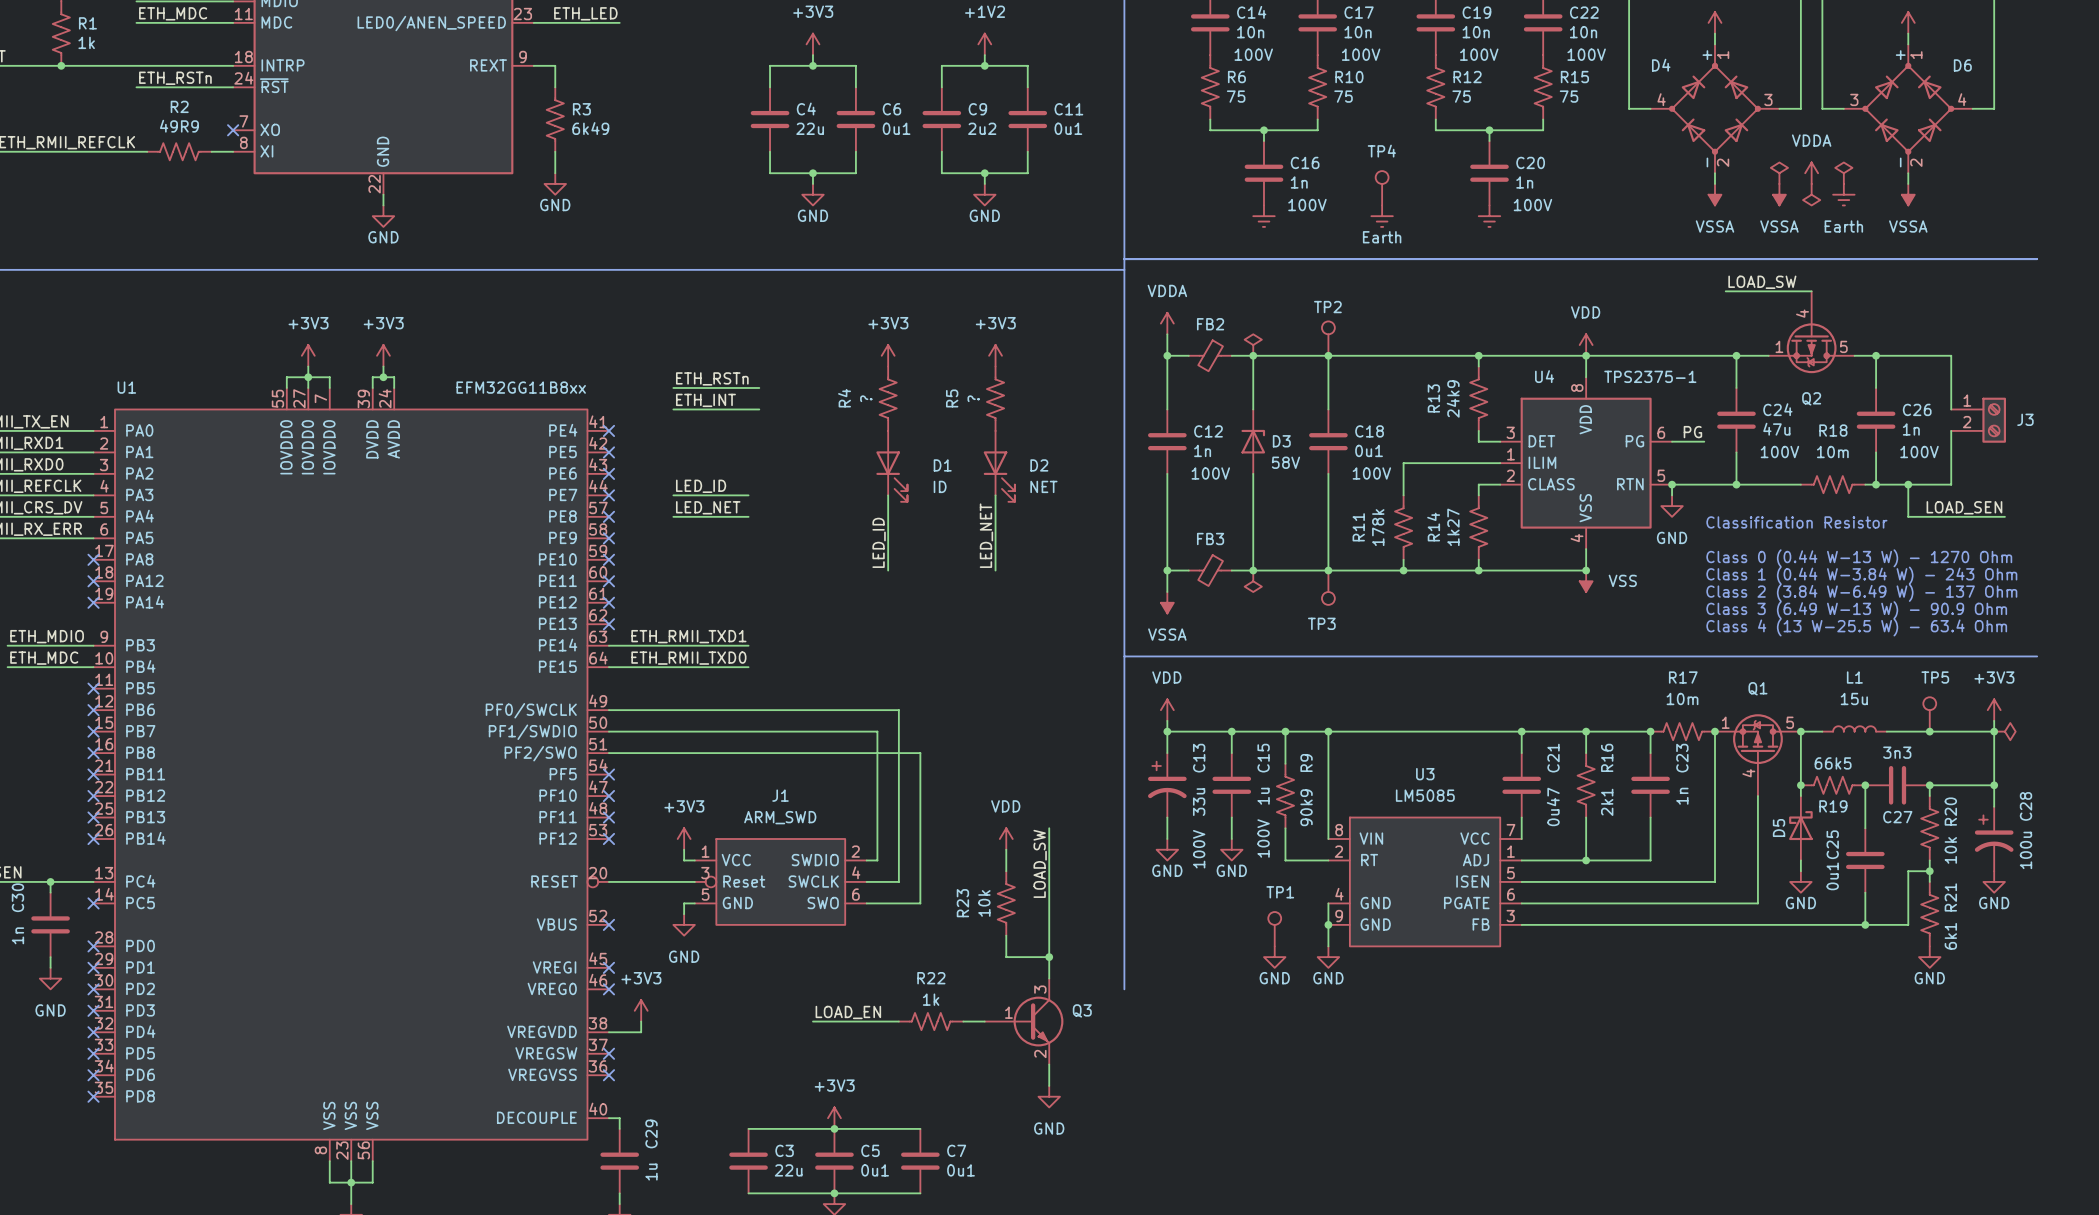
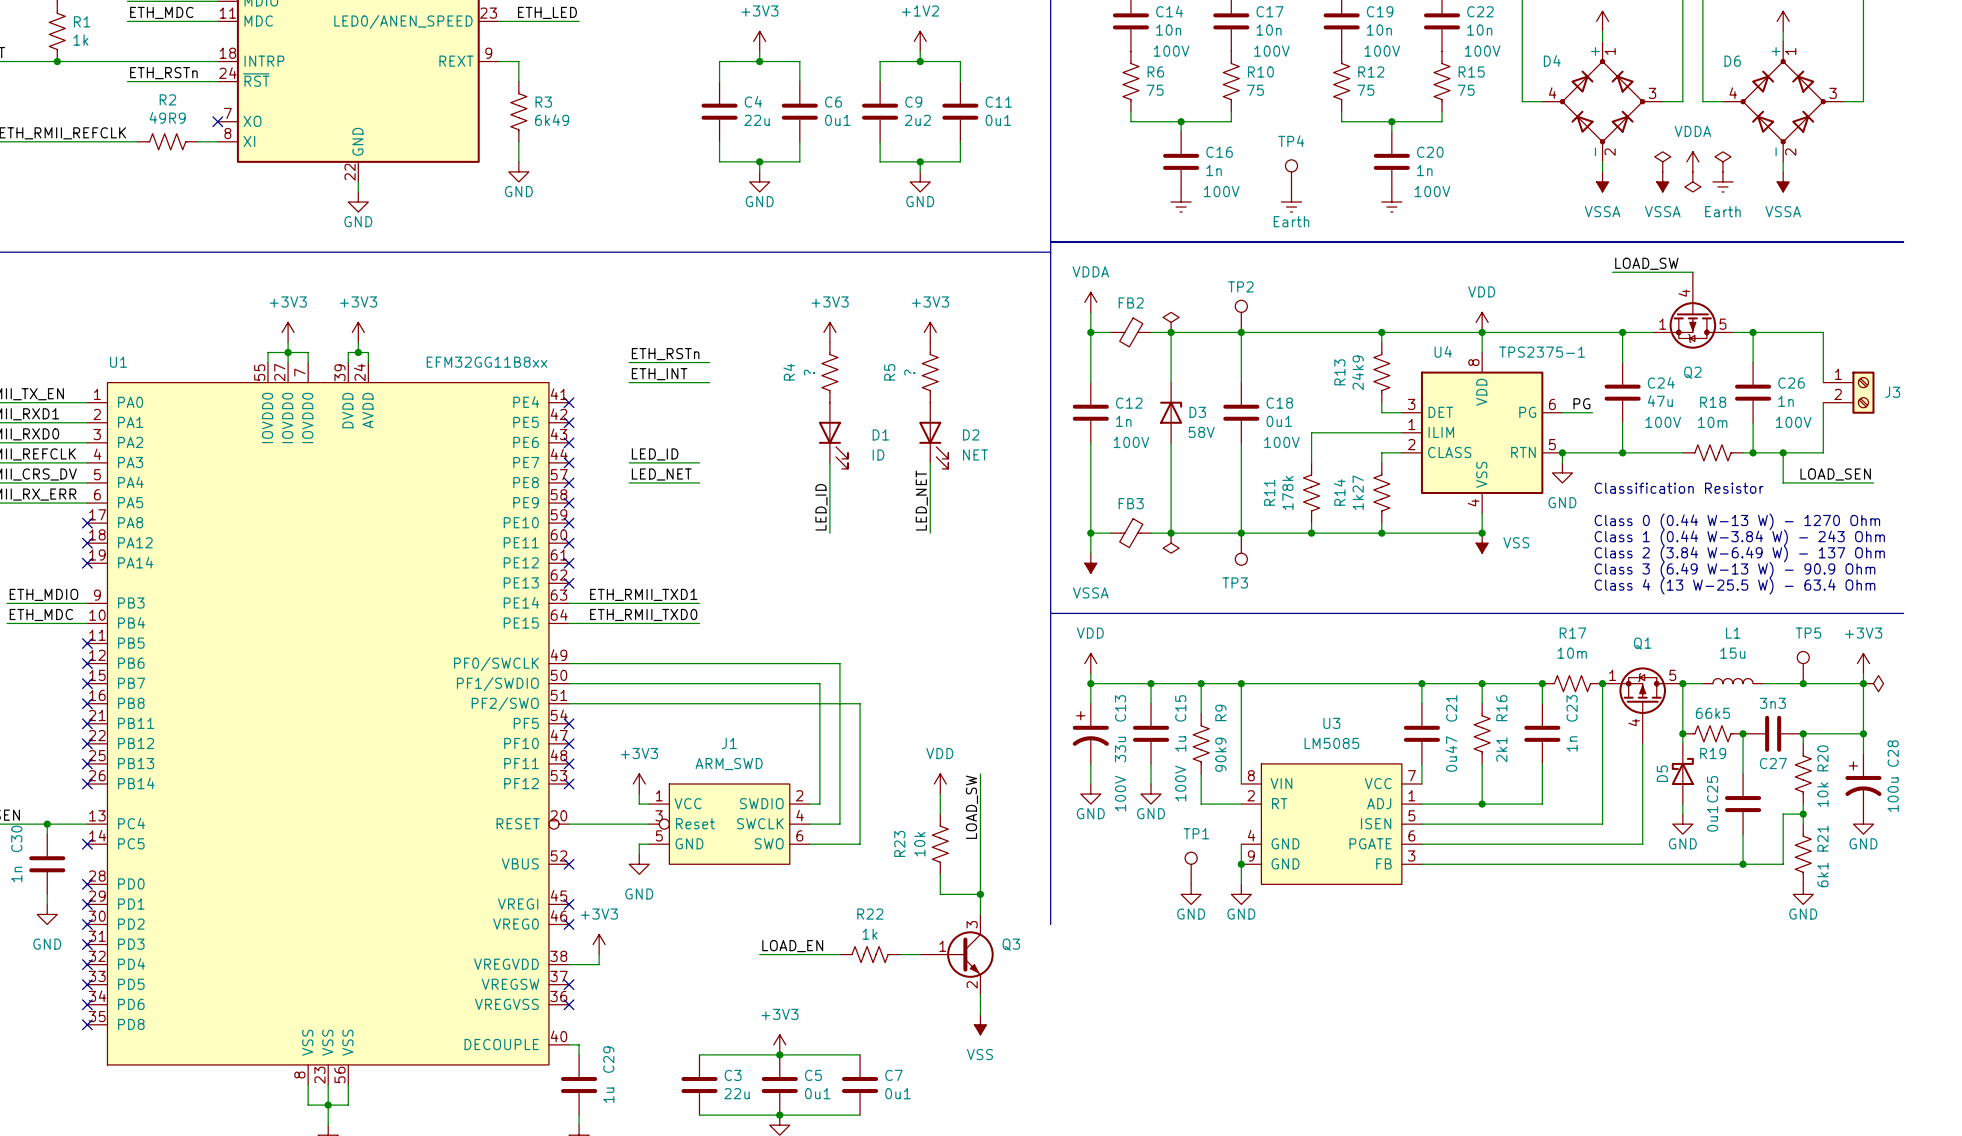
D6 flip: as is (1908, 108) -> left-right (1783, 101)
power symbol: GND (1049, 1096) -> VSS (980, 1024)

